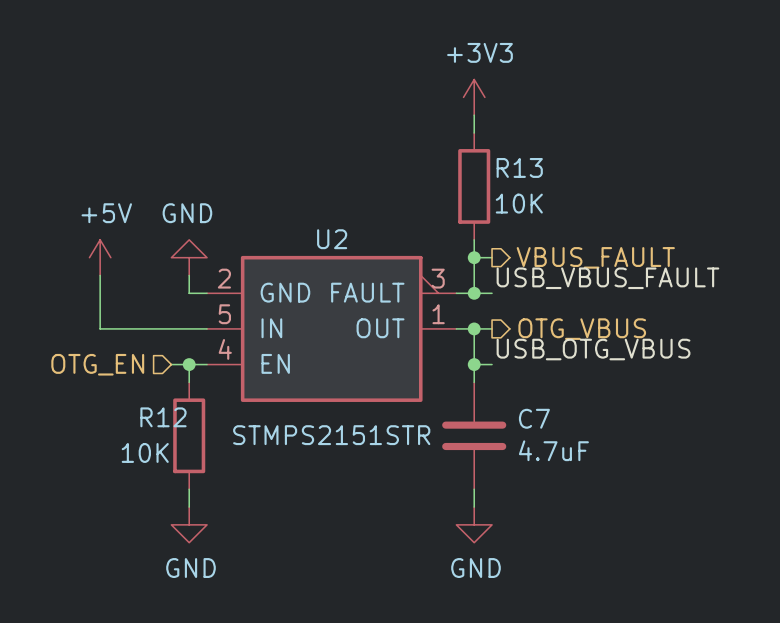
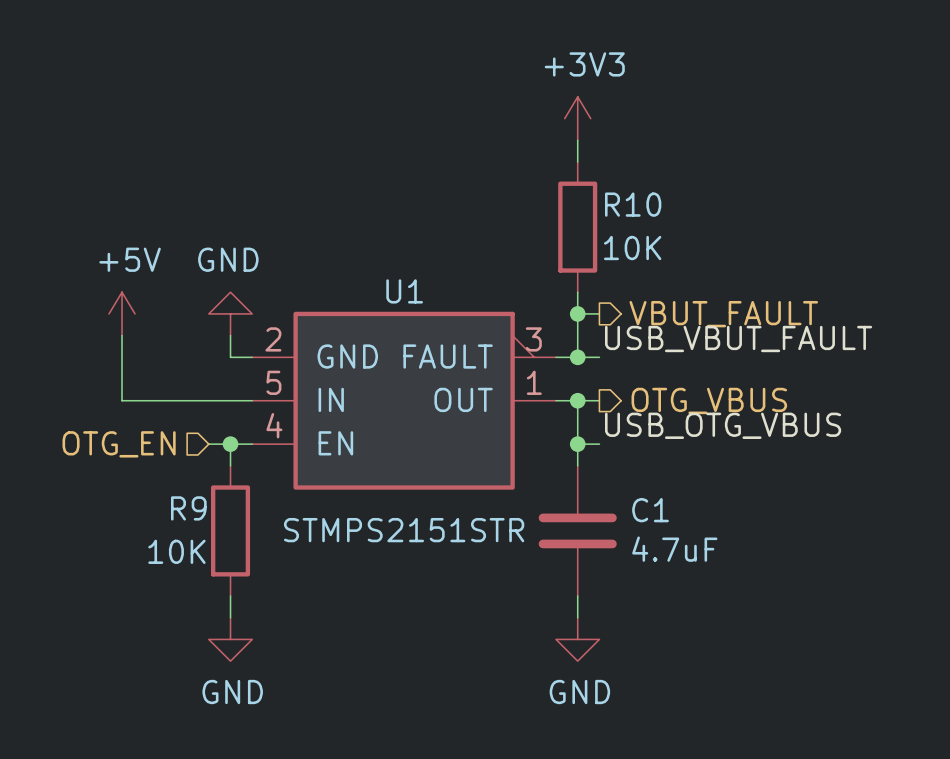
R13 name: R13 (519, 167) -> R10 (633, 204)
U2 name: U2 (332, 239) -> U1 (404, 291)
hierarchical label: VBUS_FAULT (595, 257) -> VBUT_FAULT (723, 314)
label: USB_VBUS_FAULT (607, 278) -> USB_VBUT_FAULT (738, 339)
R12 name: R12 (163, 417) -> R9 (188, 508)
C7 name: C7 (534, 418) -> C1 (650, 510)

